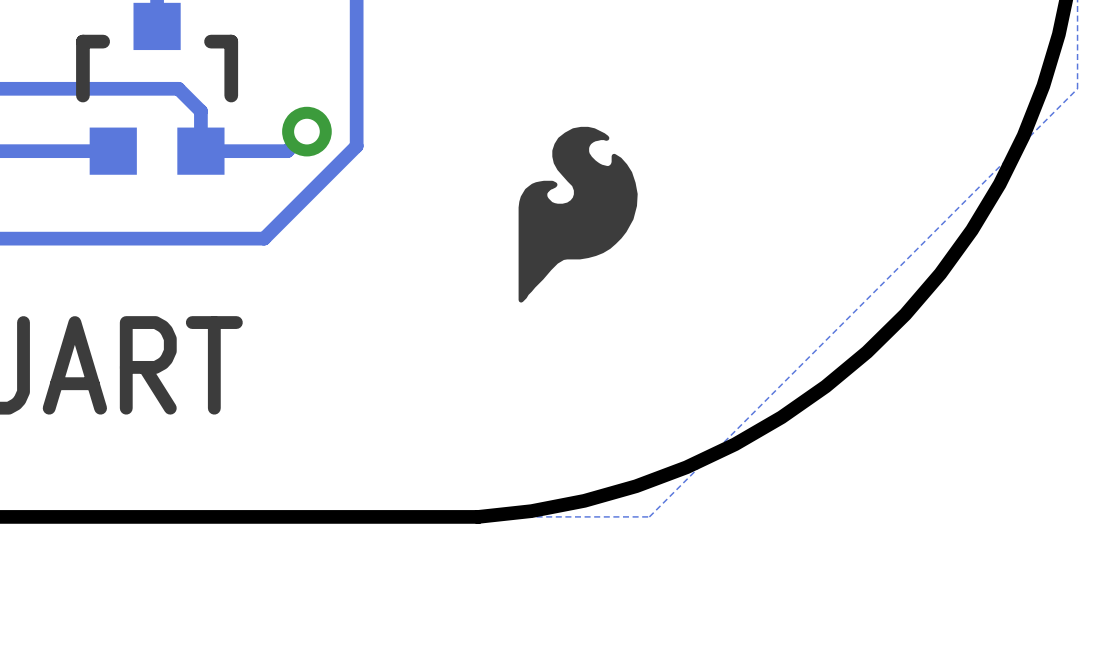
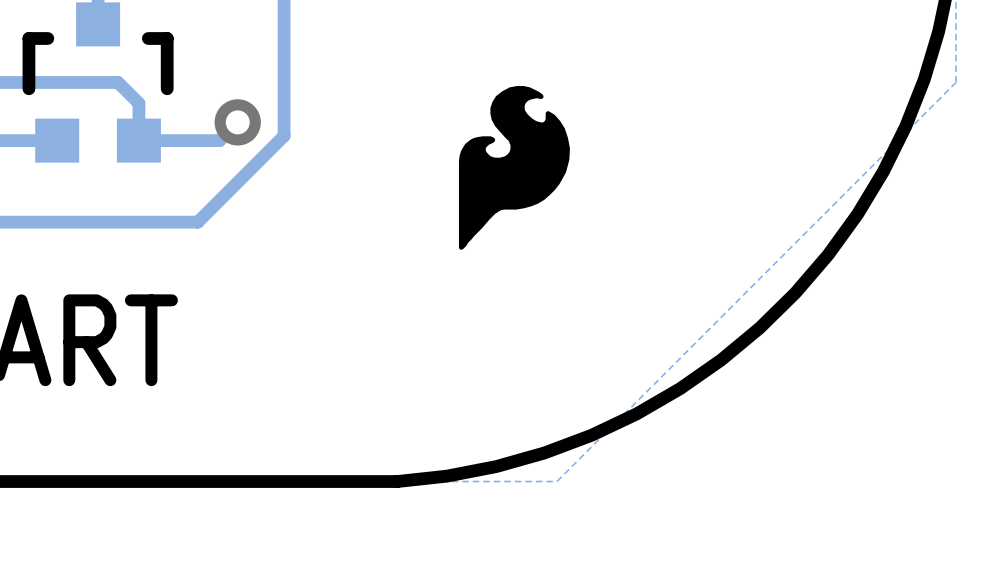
drawing position: (578, 214) -> (514, 167)

